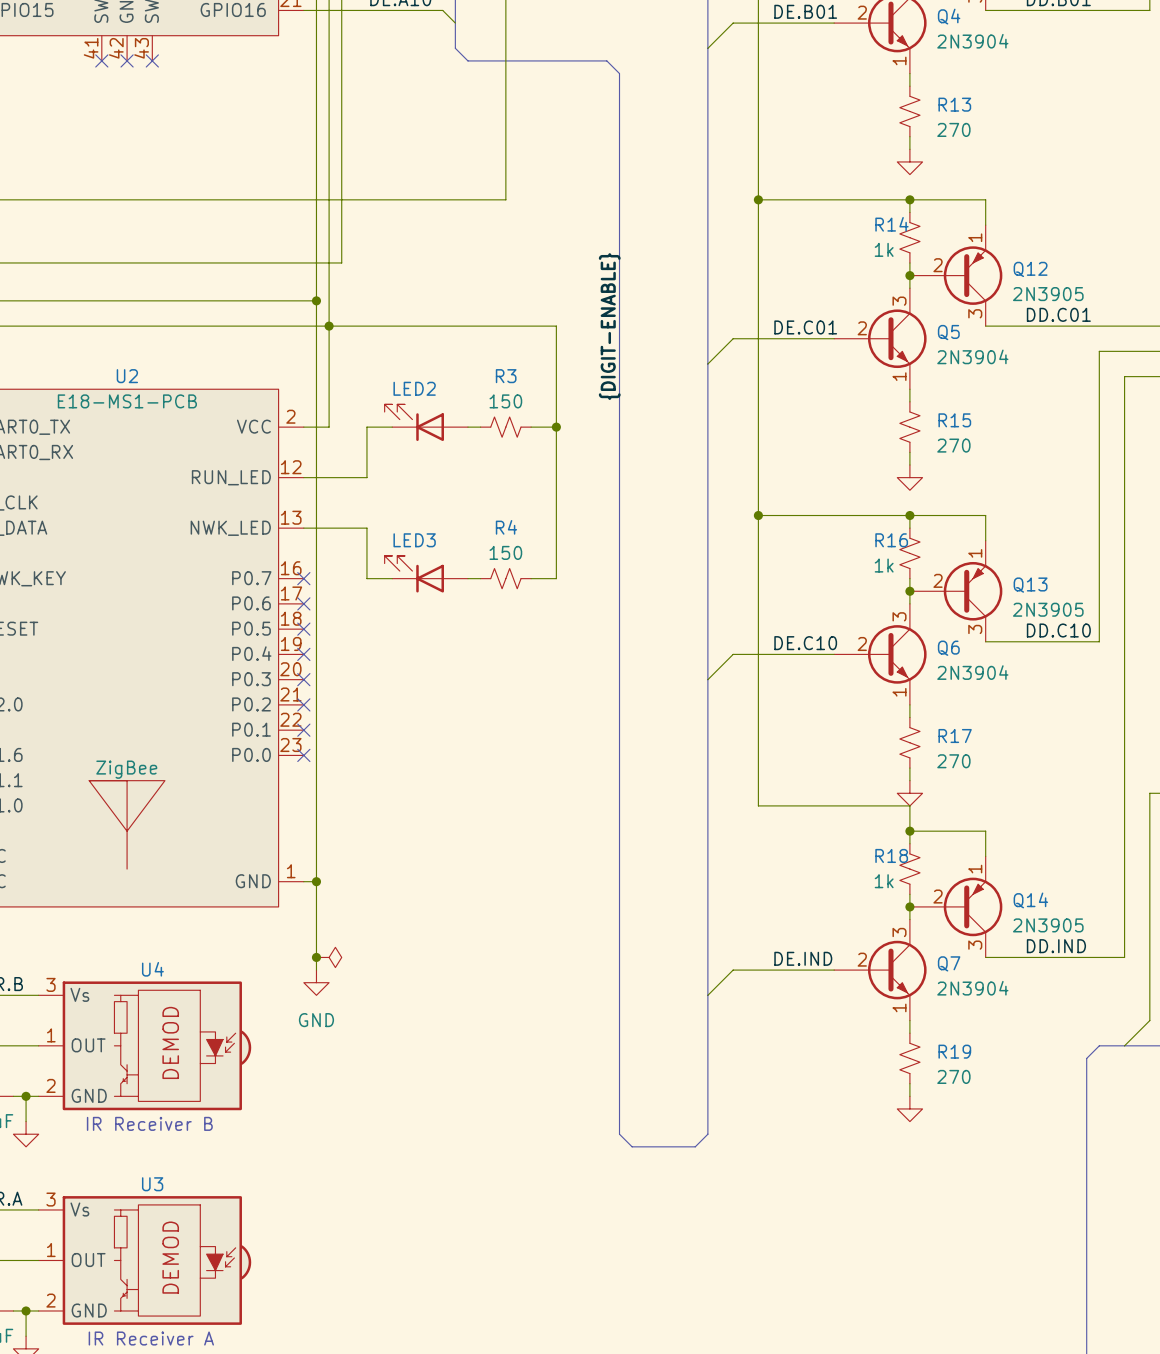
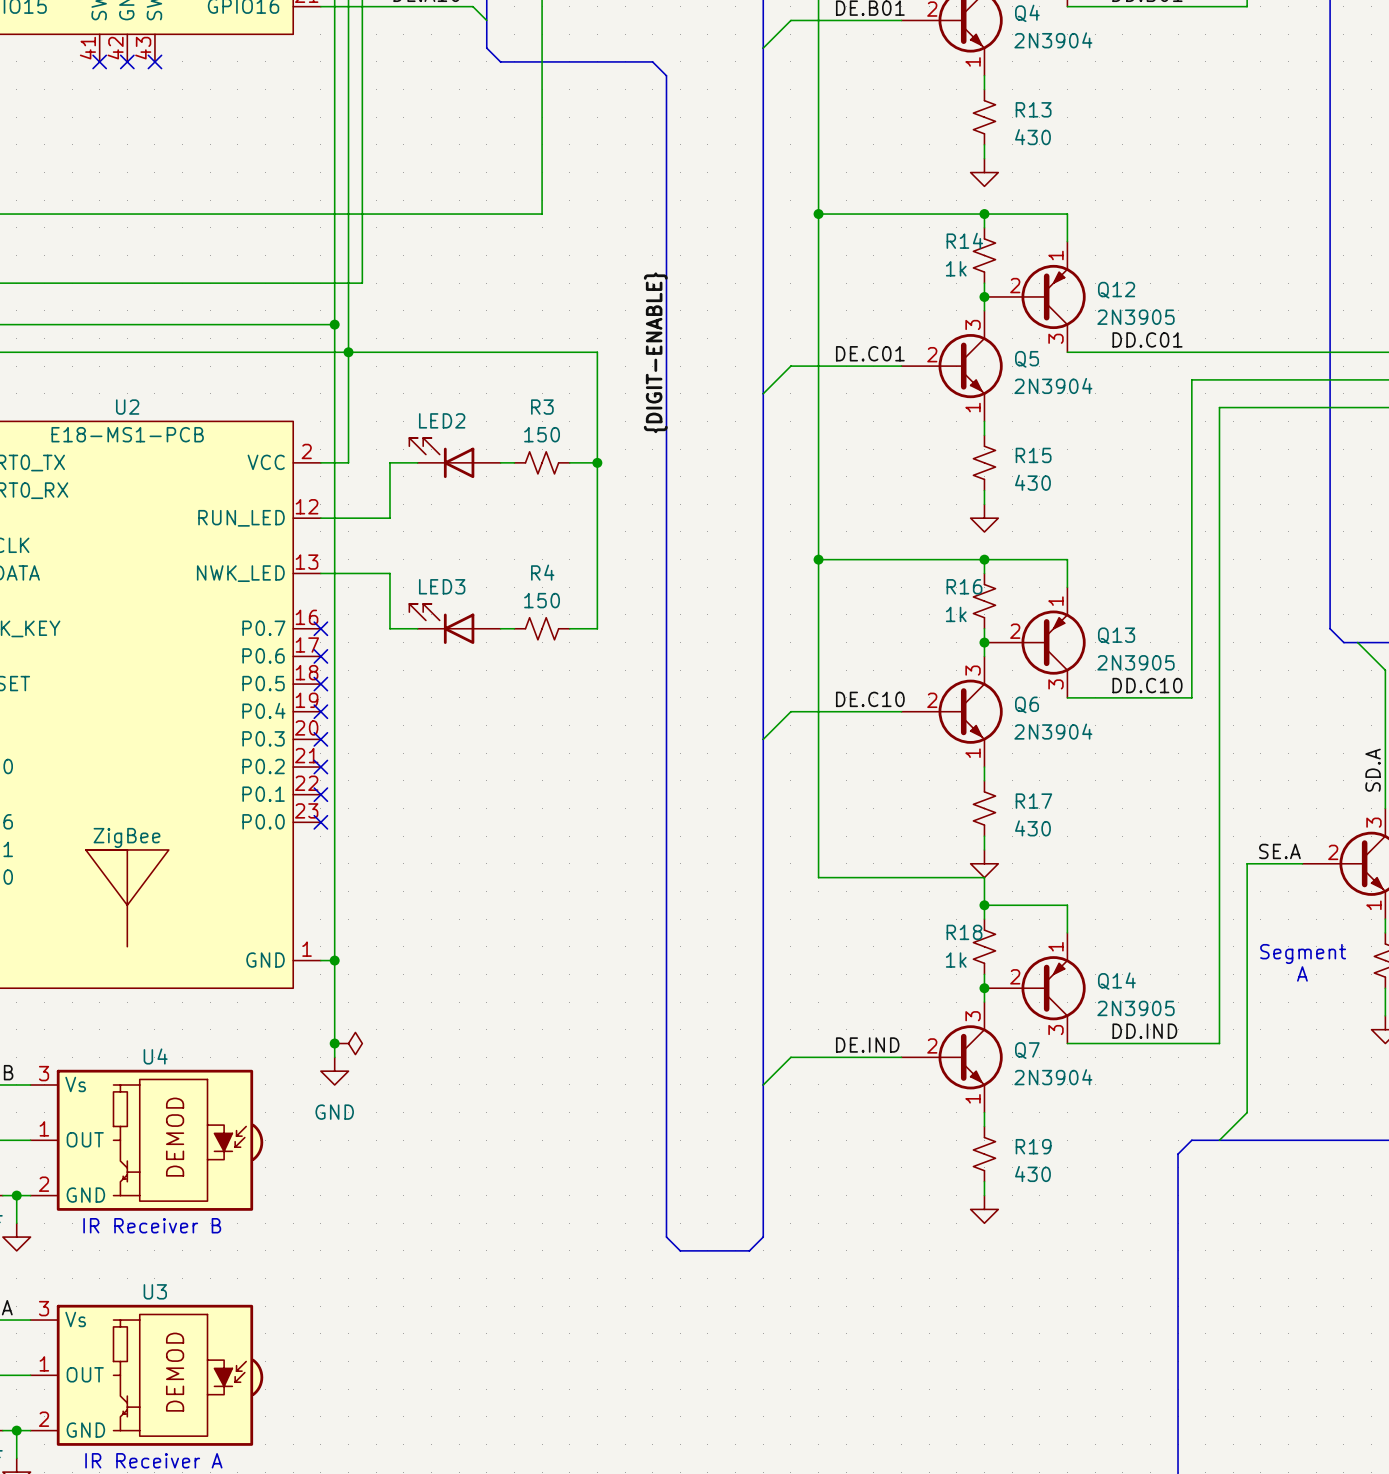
R13 value: 270 (953, 129) -> 430 (1032, 137)
R15 value: 270 (953, 445) -> 430 (1032, 482)
R17 value: 270 (953, 761) -> 430 (1032, 828)
R19 value: 270 (953, 1076) -> 430 (1032, 1174)

